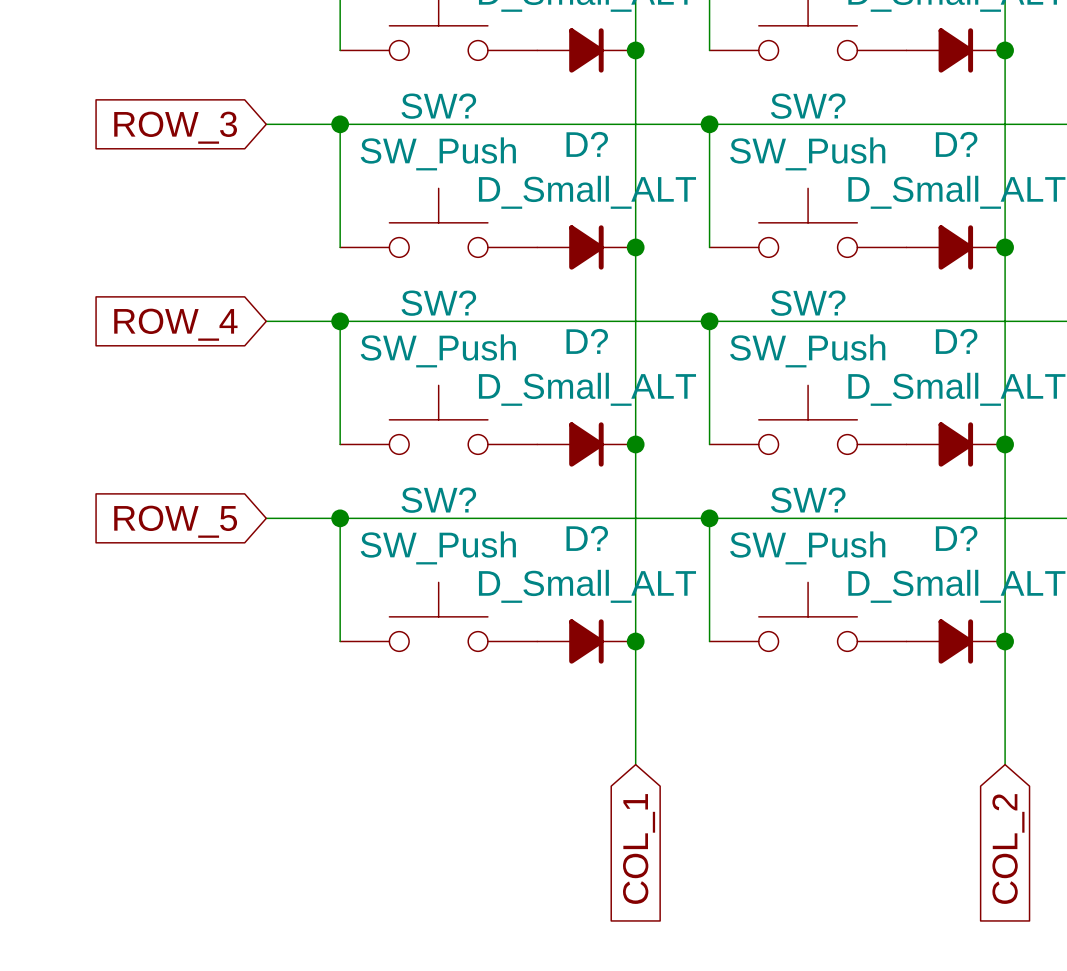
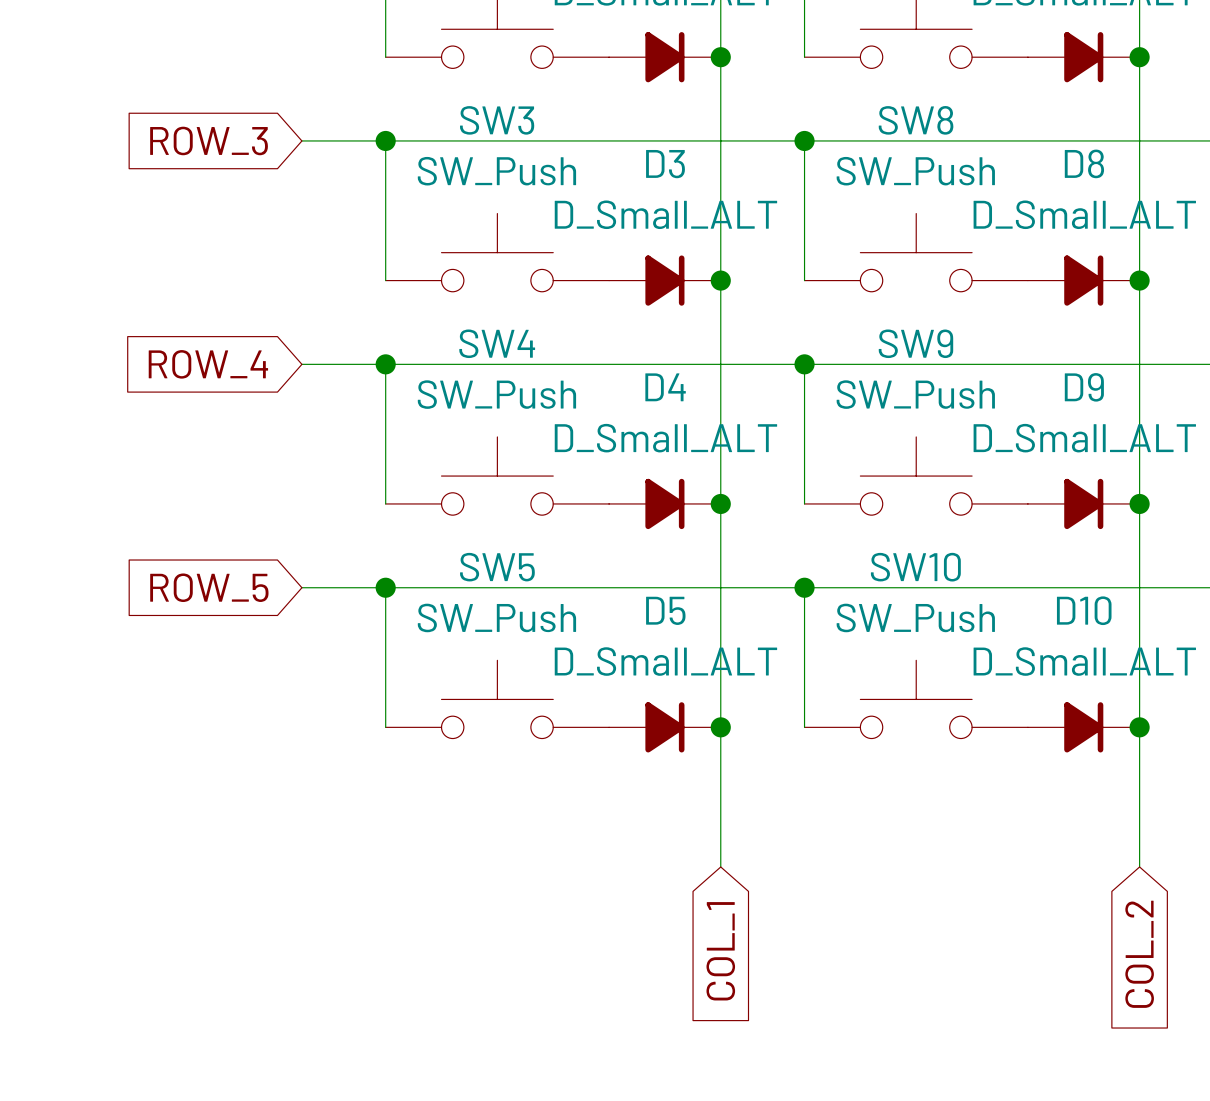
SW? name: SW? (438, 106) -> SW3 (497, 120)
SW? name: SW? (808, 106) -> SW8 (916, 120)
D? name: D? (587, 144) -> D3 (665, 164)
D? name: D? (956, 144) -> D8 (1084, 163)
SW? name: SW? (438, 303) -> SW4 (497, 343)
SW? name: SW? (808, 303) -> SW9 (915, 343)
D? name: D? (587, 341) -> D4 (665, 387)
D? name: D? (956, 341) -> D9 (1084, 387)
SW? name: SW? (438, 500) -> SW5 (497, 567)
SW? name: SW? (808, 500) -> SW10 (915, 567)
D? name: D? (587, 538) -> D5 (665, 610)
D? name: D? (956, 538) -> D10 (1084, 610)

